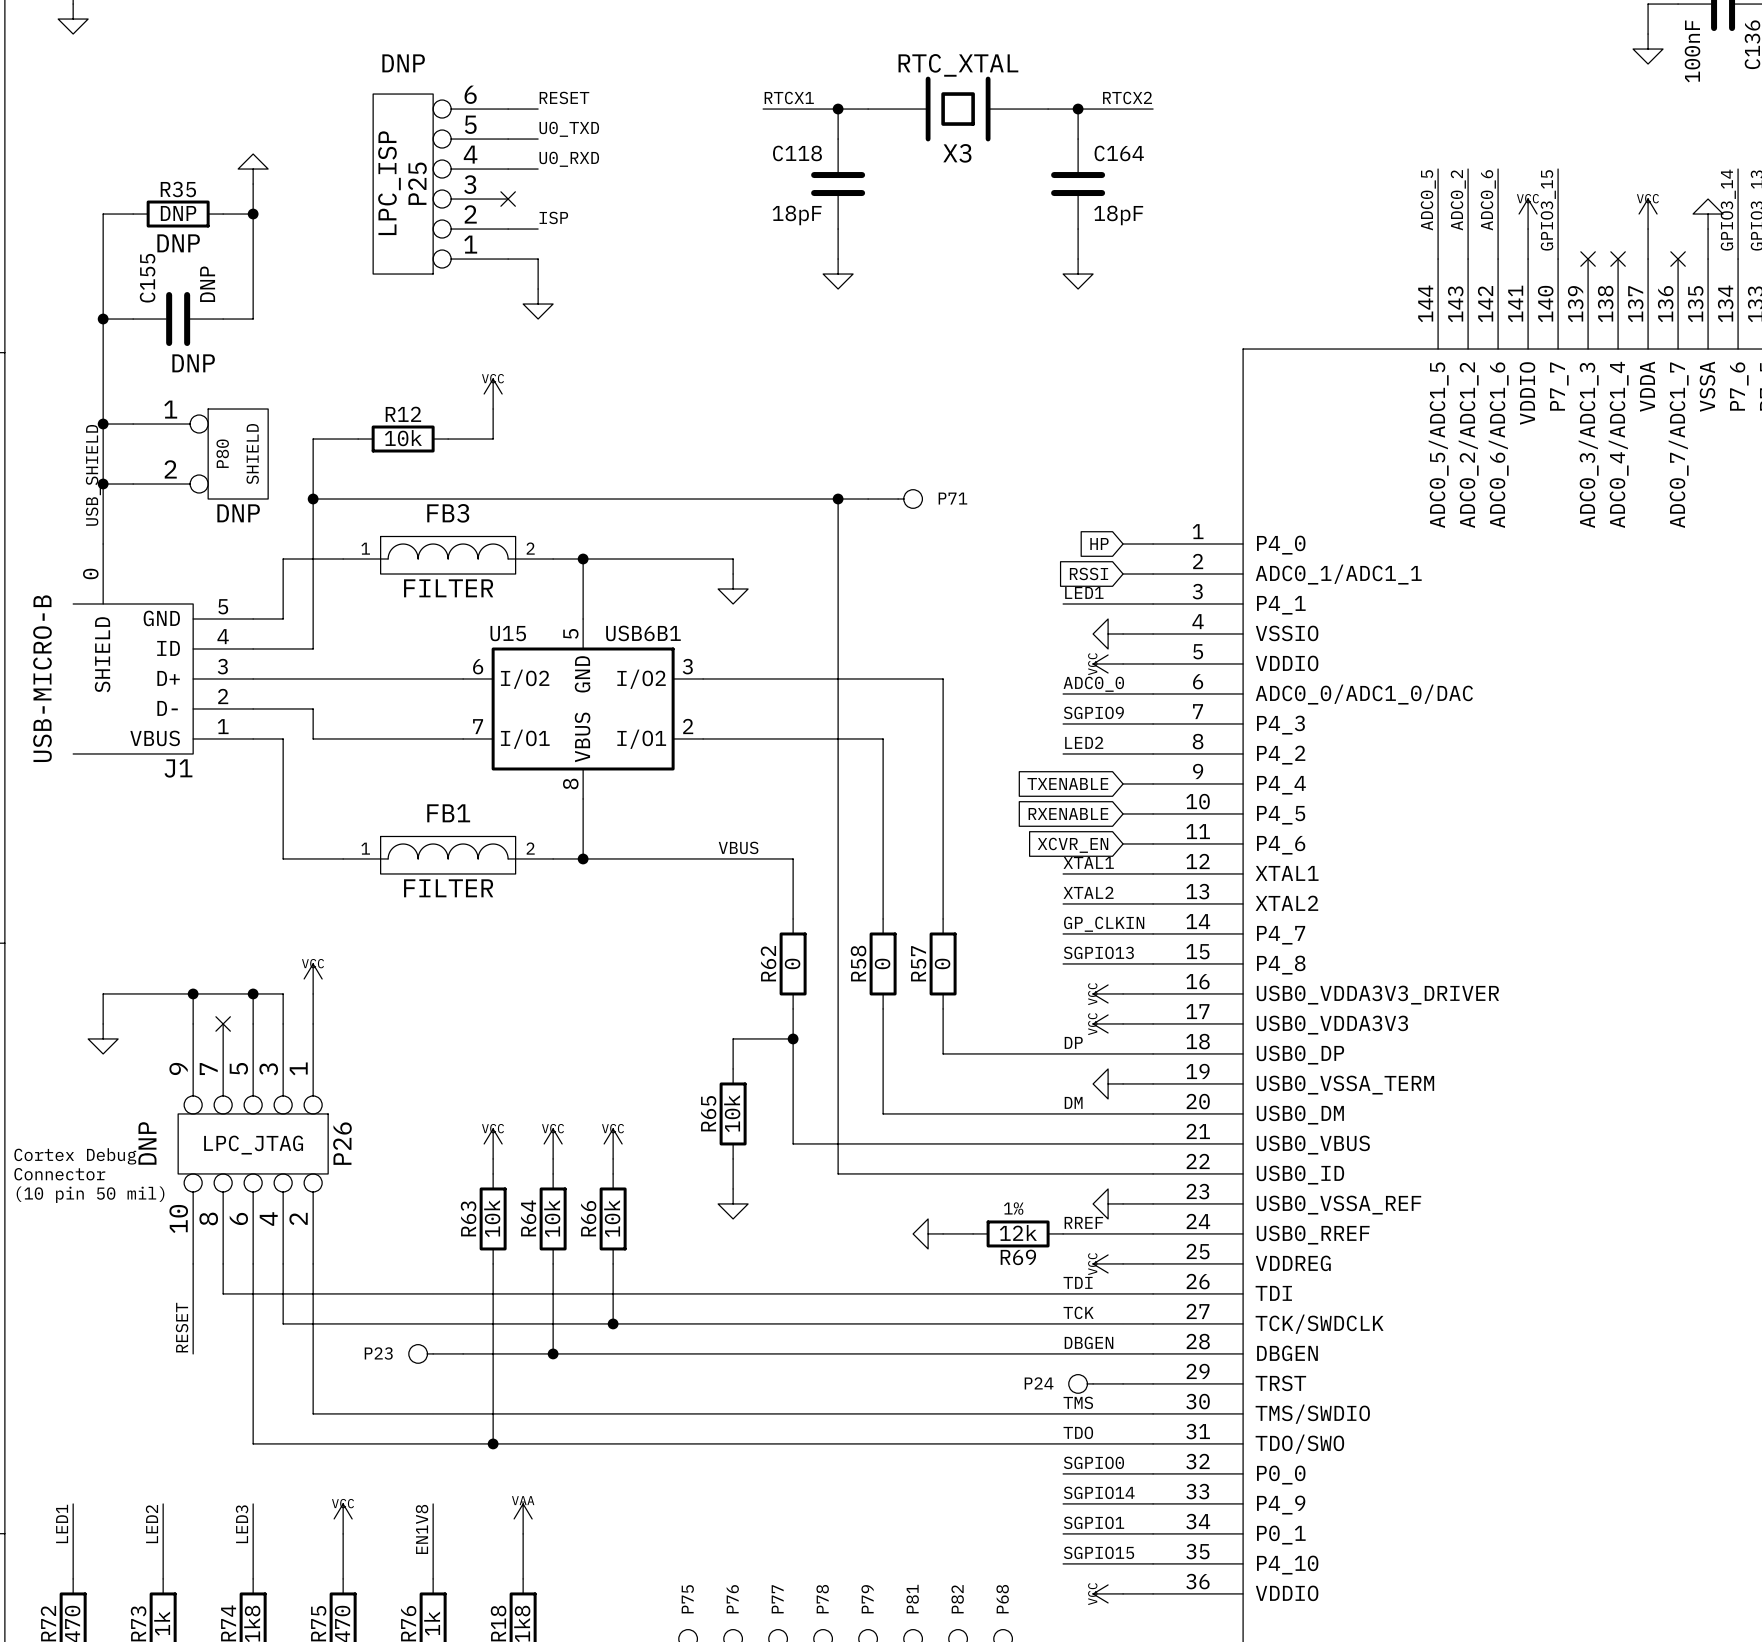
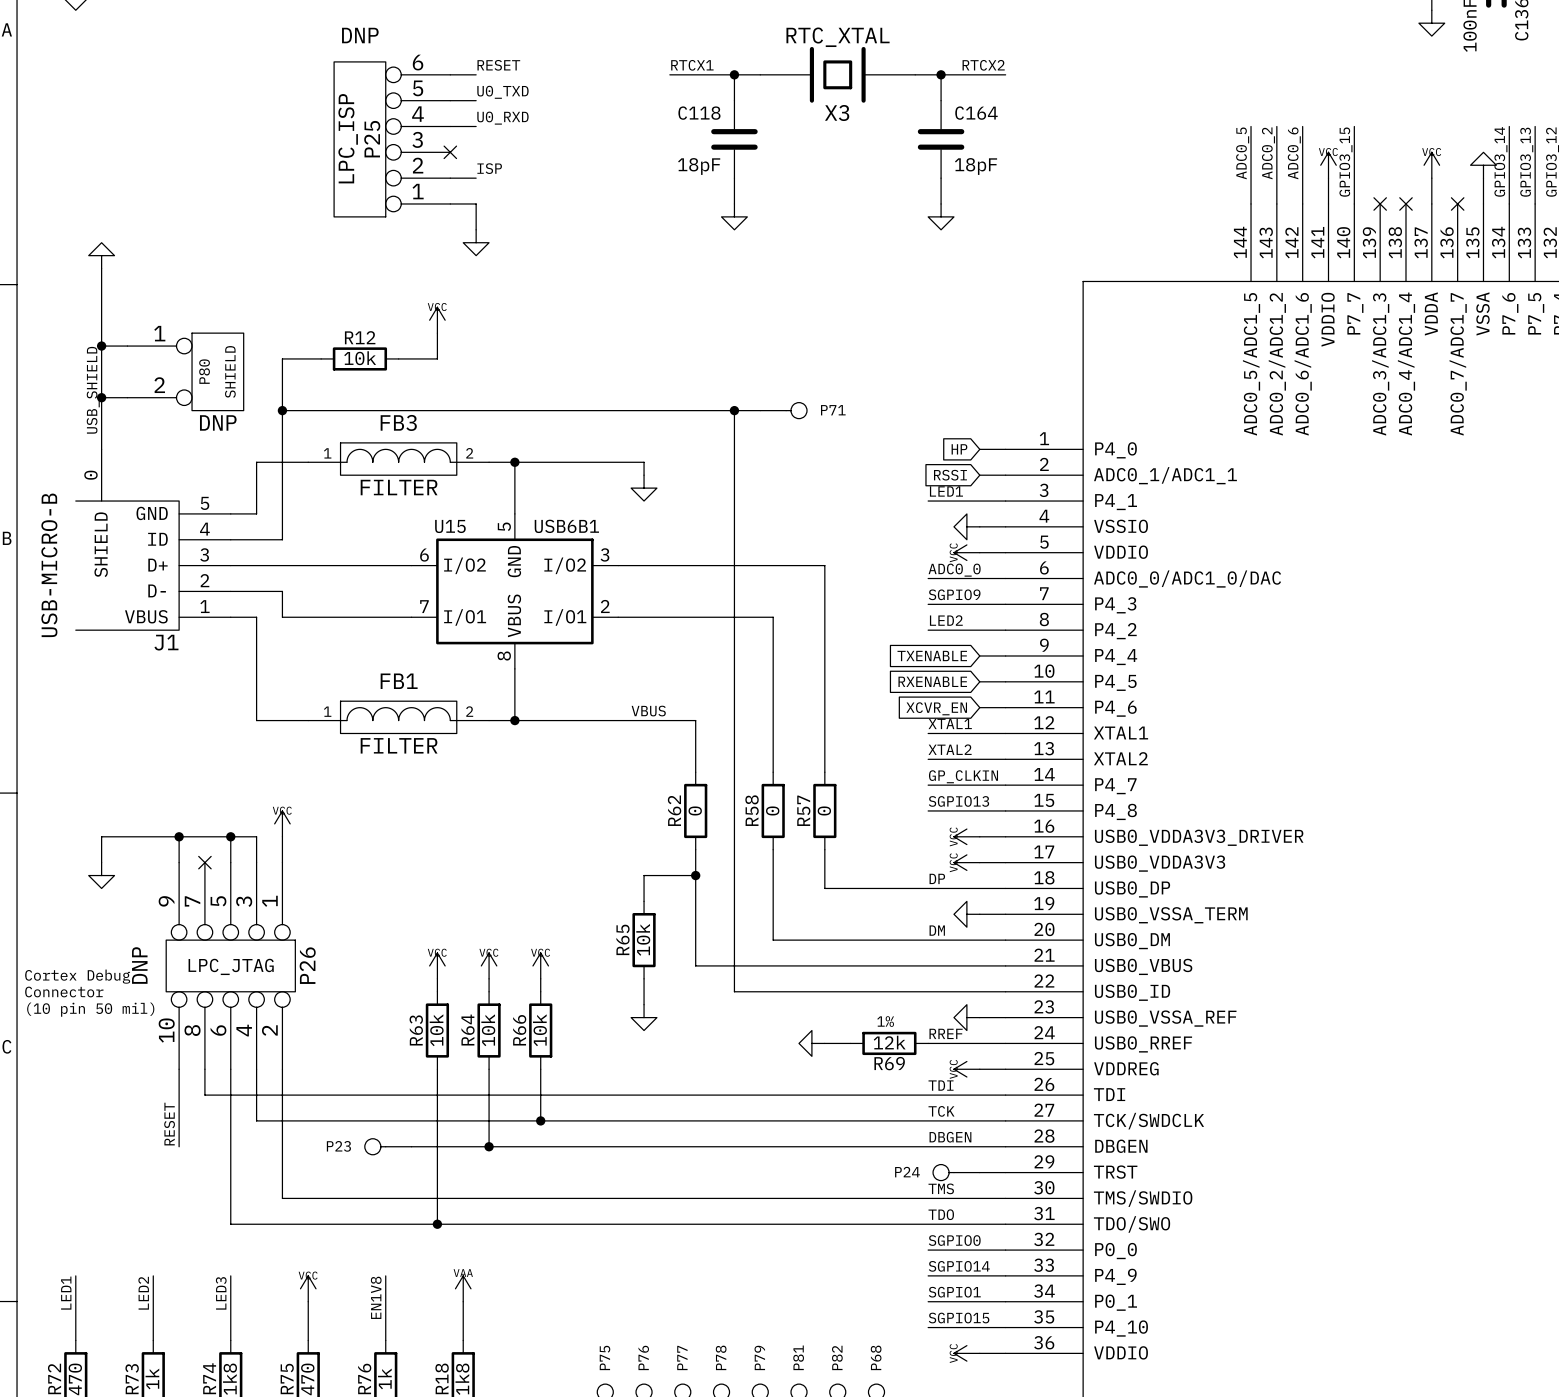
power symbol position: (253, 169) -> (101, 255)
wire: (253, 184) (253, 319) (223, 319) -> none
wire: (133, 214) (103, 214) (103, 334) -> none
R35: DNP (178, 214) -> none
wire: (223, 214) (253, 214) -> none
junction: (253, 214) -> none
wire: (103, 319) (133, 319) -> none
junction: (103, 319) -> none
C155: DNP (178, 319) -> none

